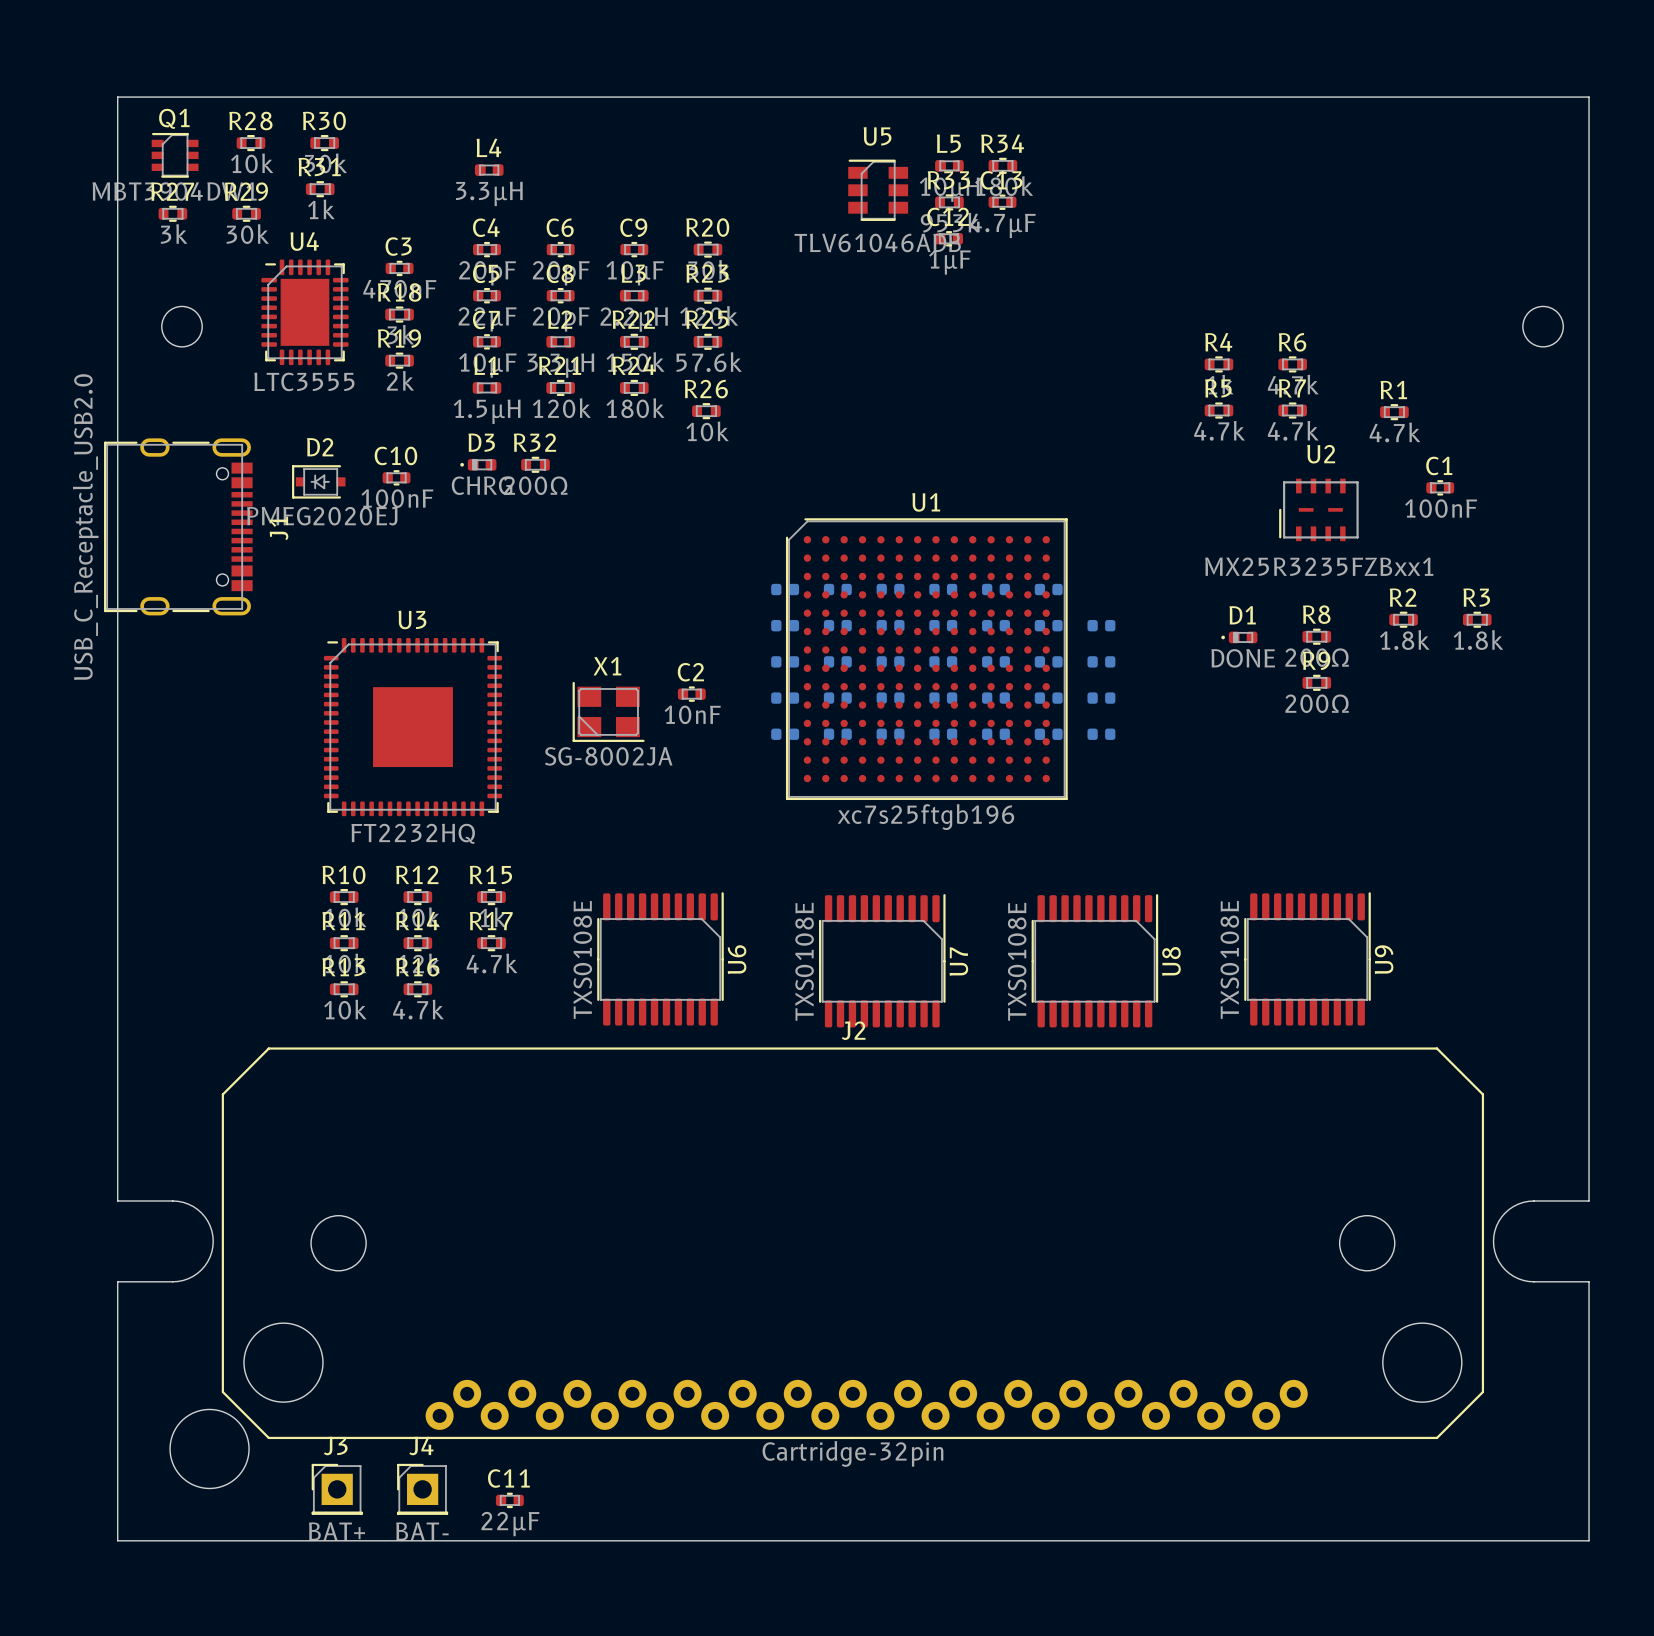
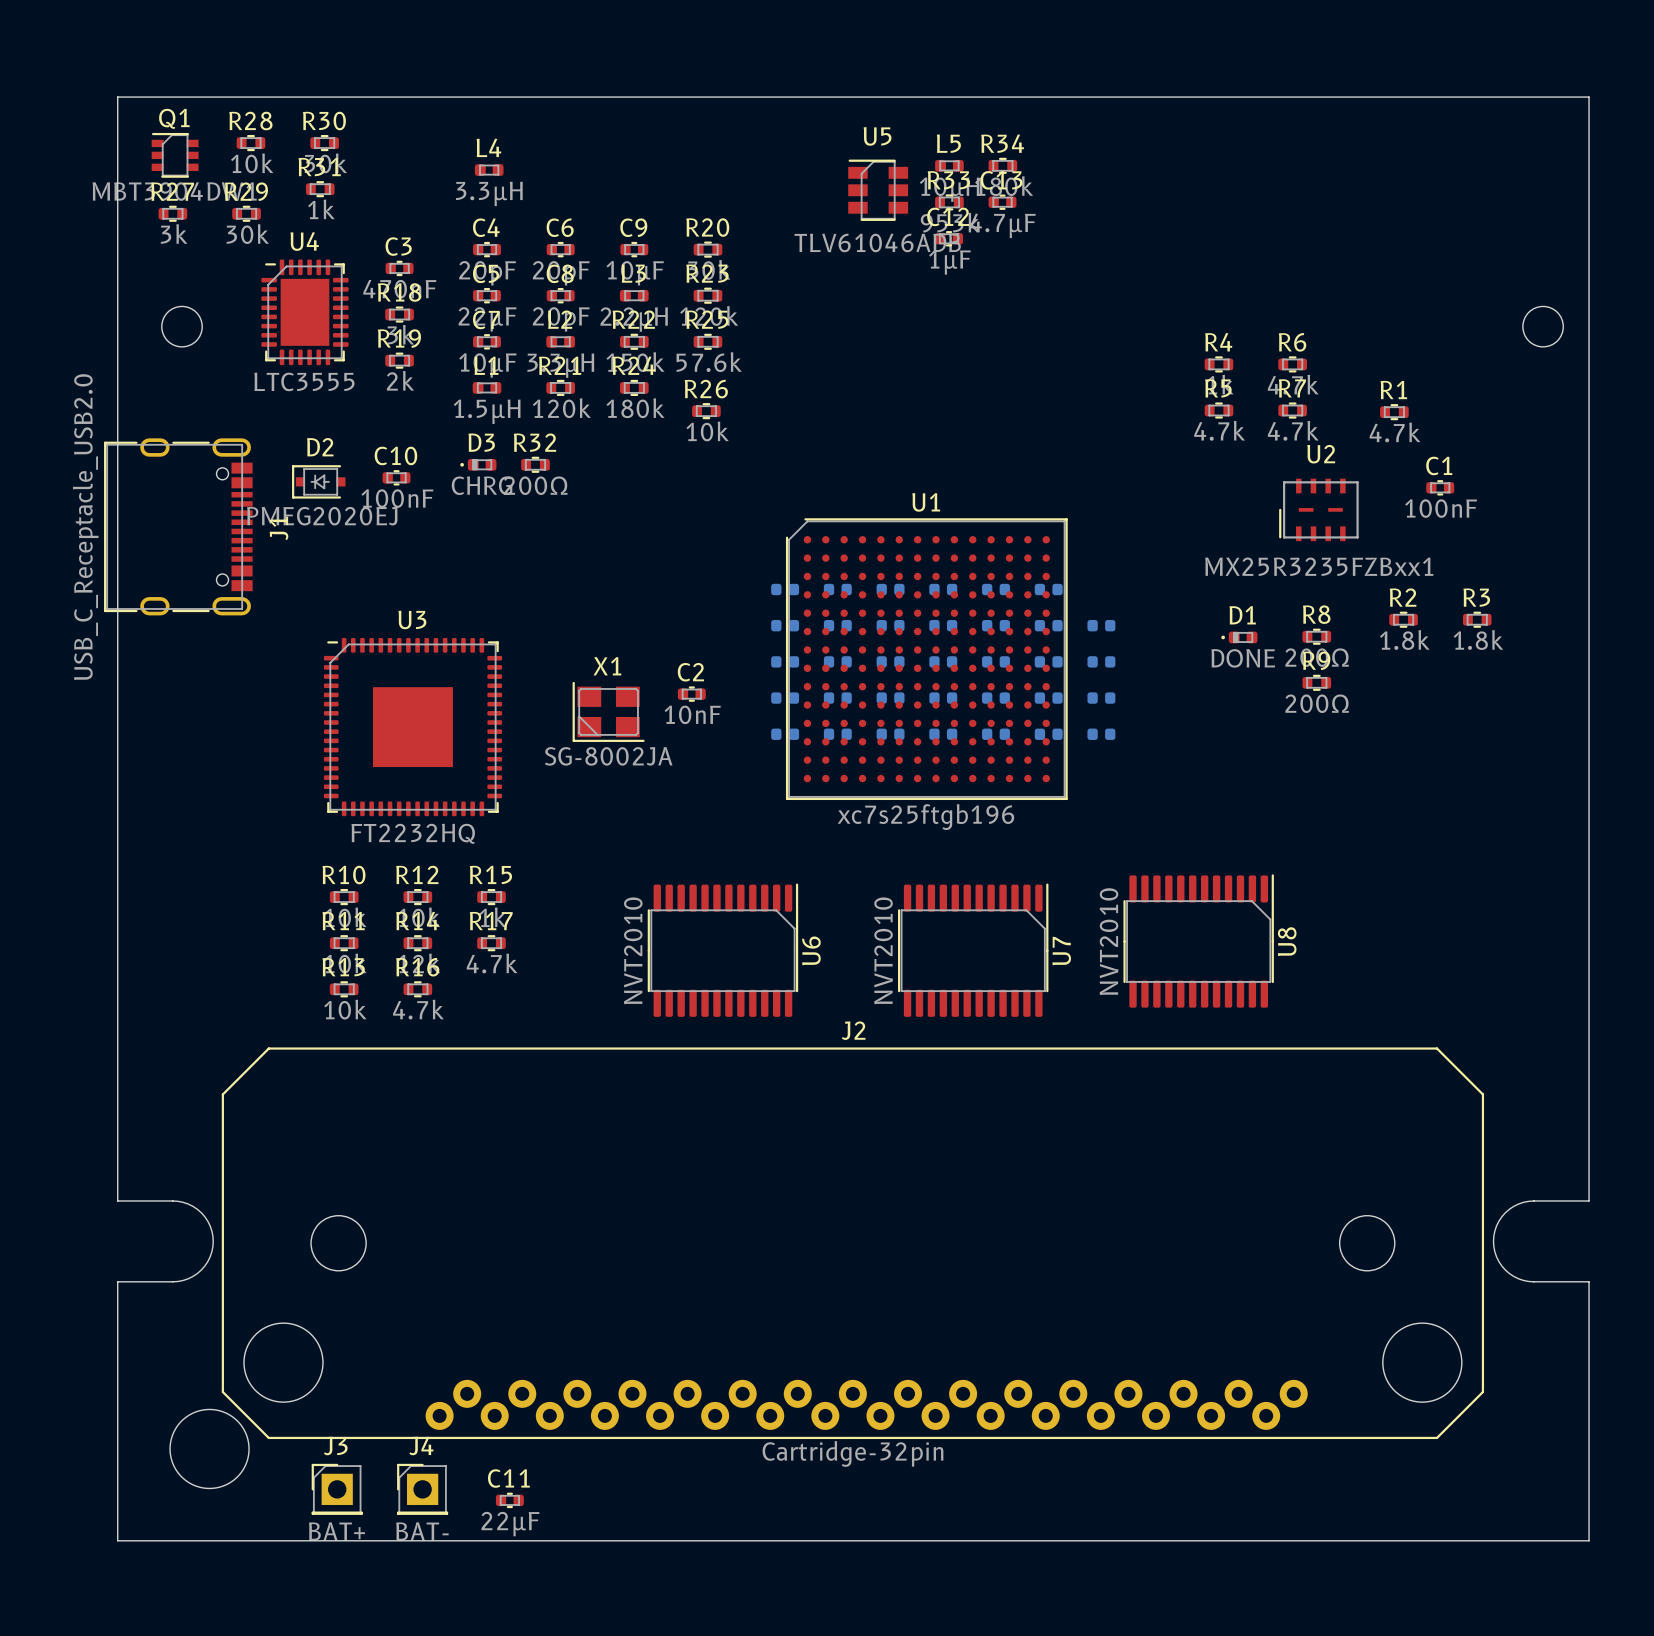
U6 footprint: [597, 892, 724, 1026] -> [647, 883, 799, 1017]
U7 footprint: [819, 894, 946, 1028] -> [897, 883, 1049, 1017]
U8 footprint: [1031, 894, 1159, 1028] -> [1123, 874, 1274, 1008]
U9: TXS0108E (1307, 958) -> none
U6 value: TXS0108E (582, 959) -> NVT2010 (633, 950)
U7 value: TXS0108E (804, 961) -> NVT2010 (883, 950)
U8 value: TXS0108E (1017, 961) -> NVT2010 (1109, 941)

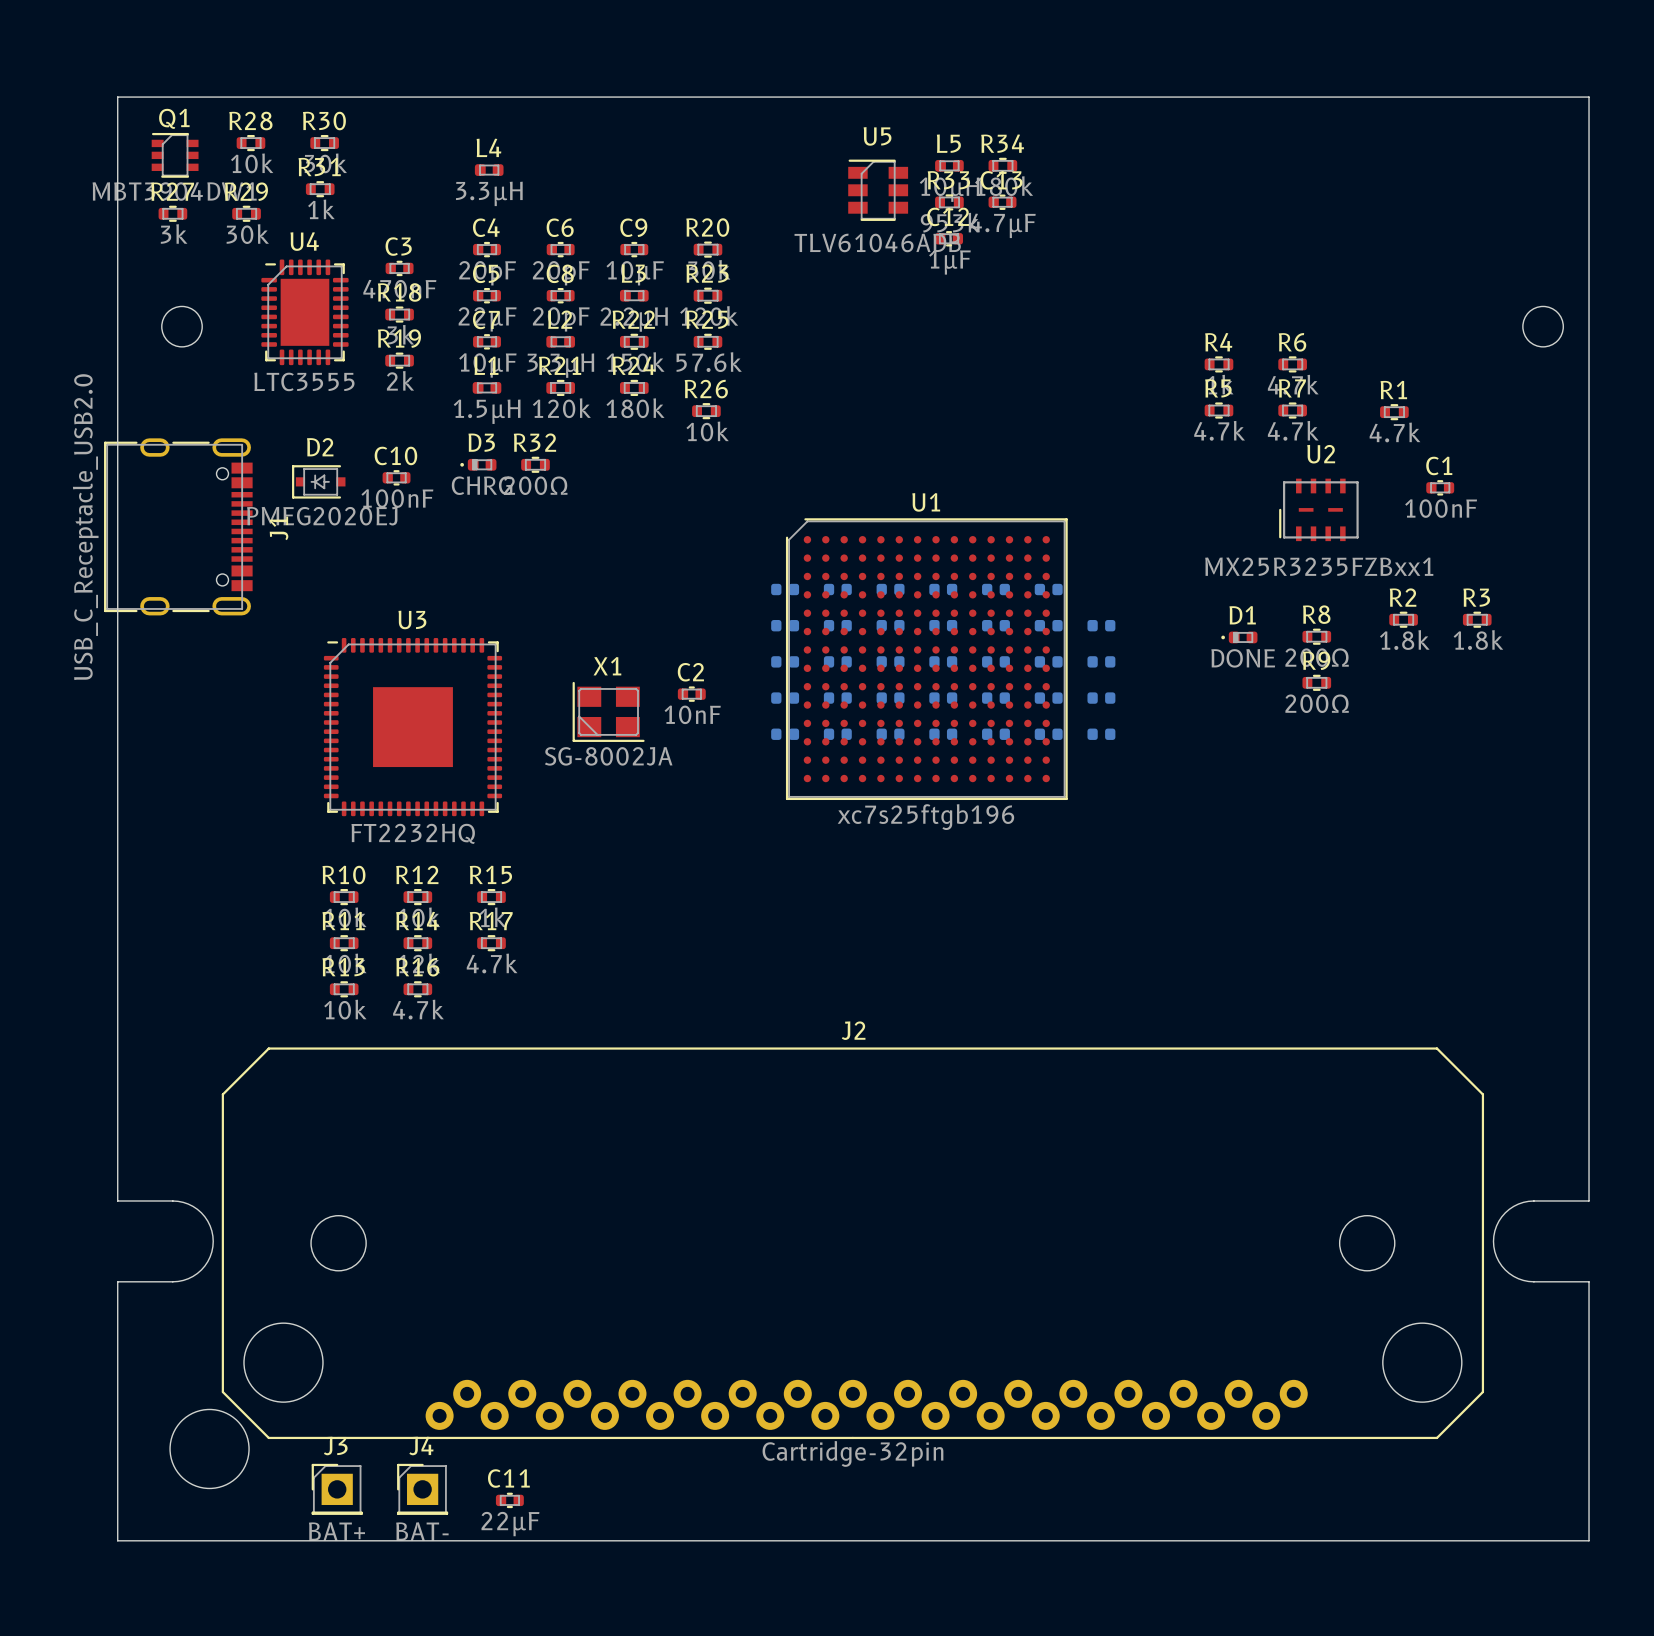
U8: NVT2010 (1198, 940) -> none
U6: NVT2010 (722, 950) -> none
U7: NVT2010 (973, 950) -> none

